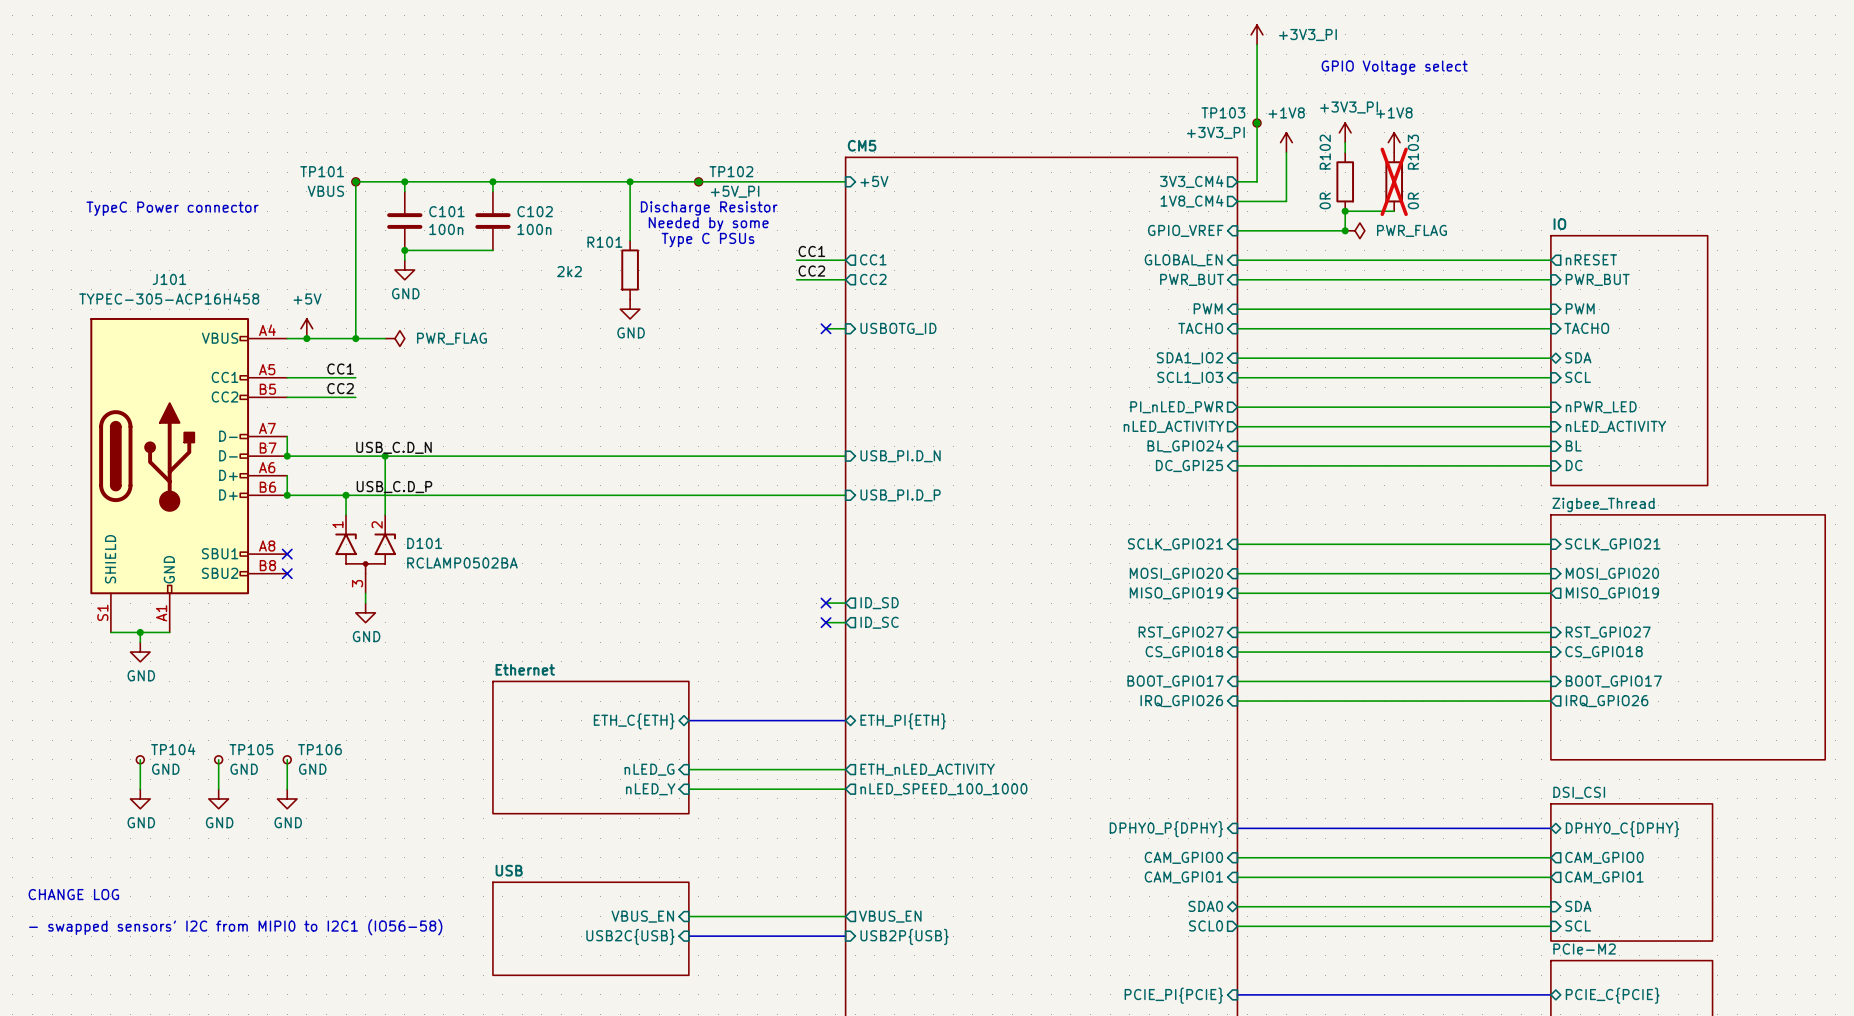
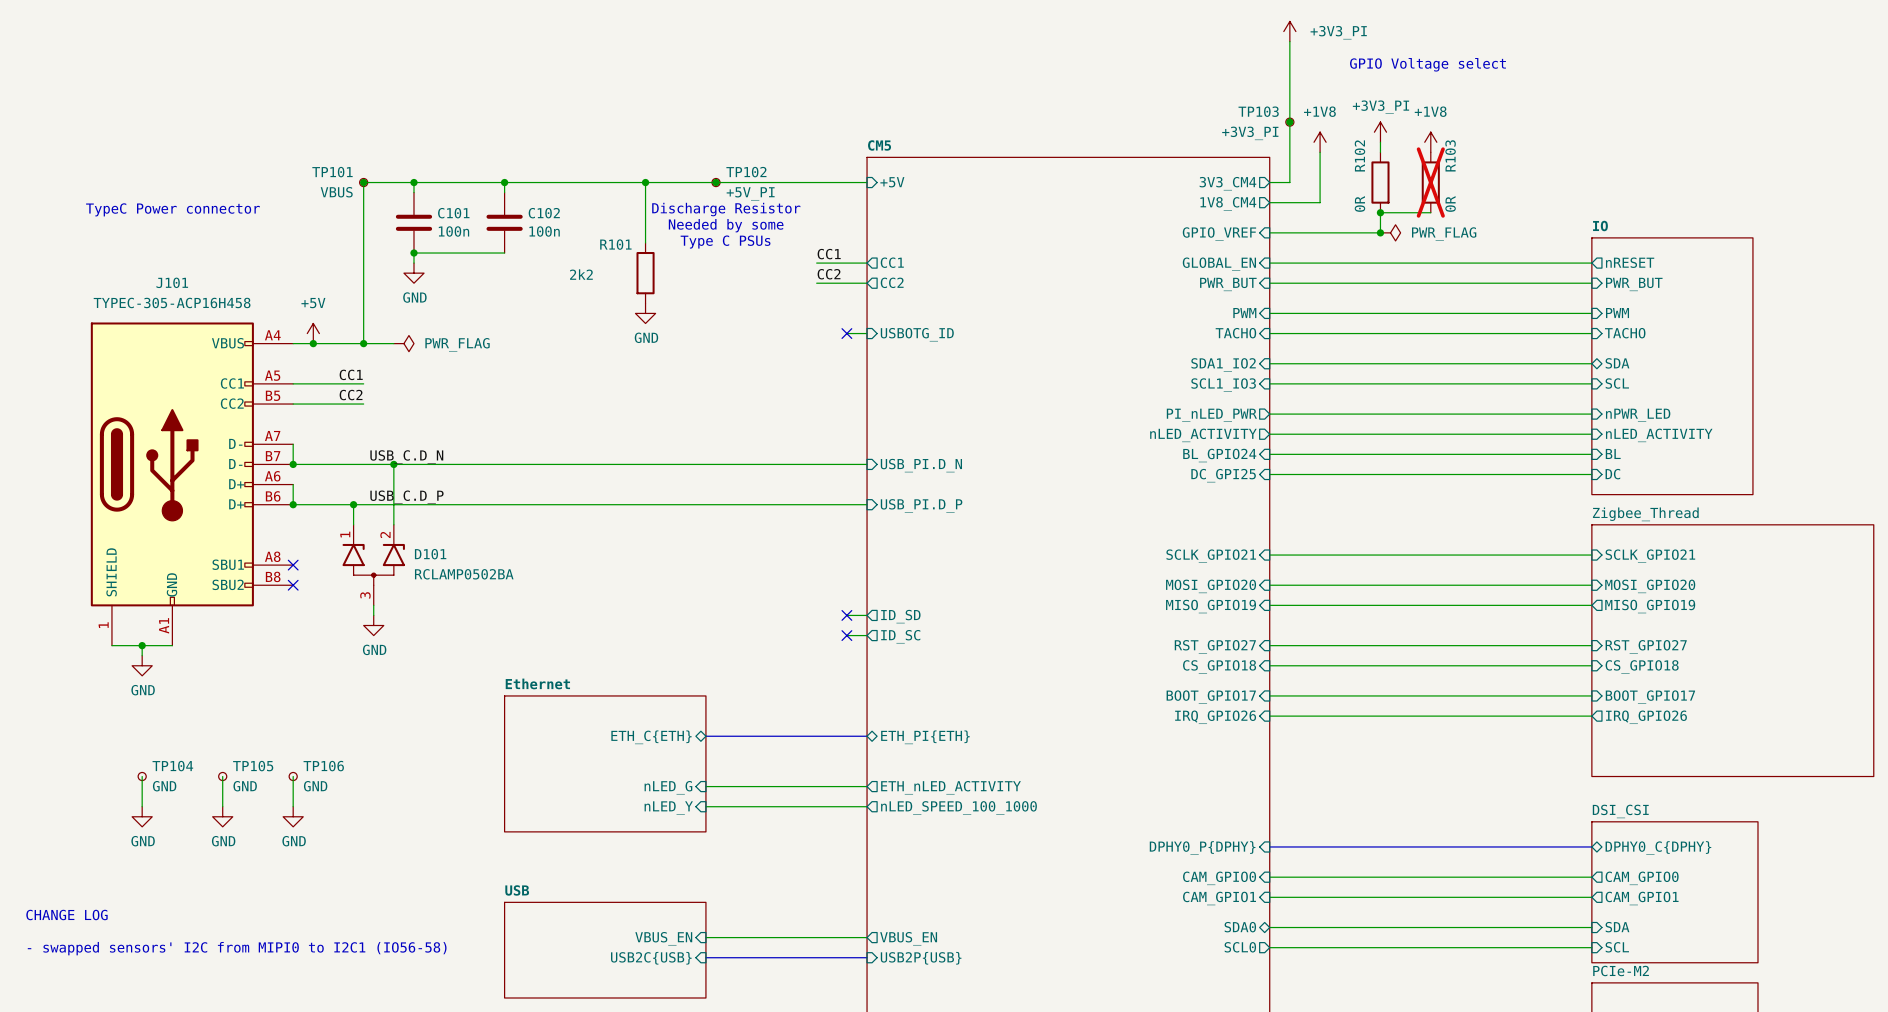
J101 pin number: S1 (102, 612) -> 1 (103, 625)

